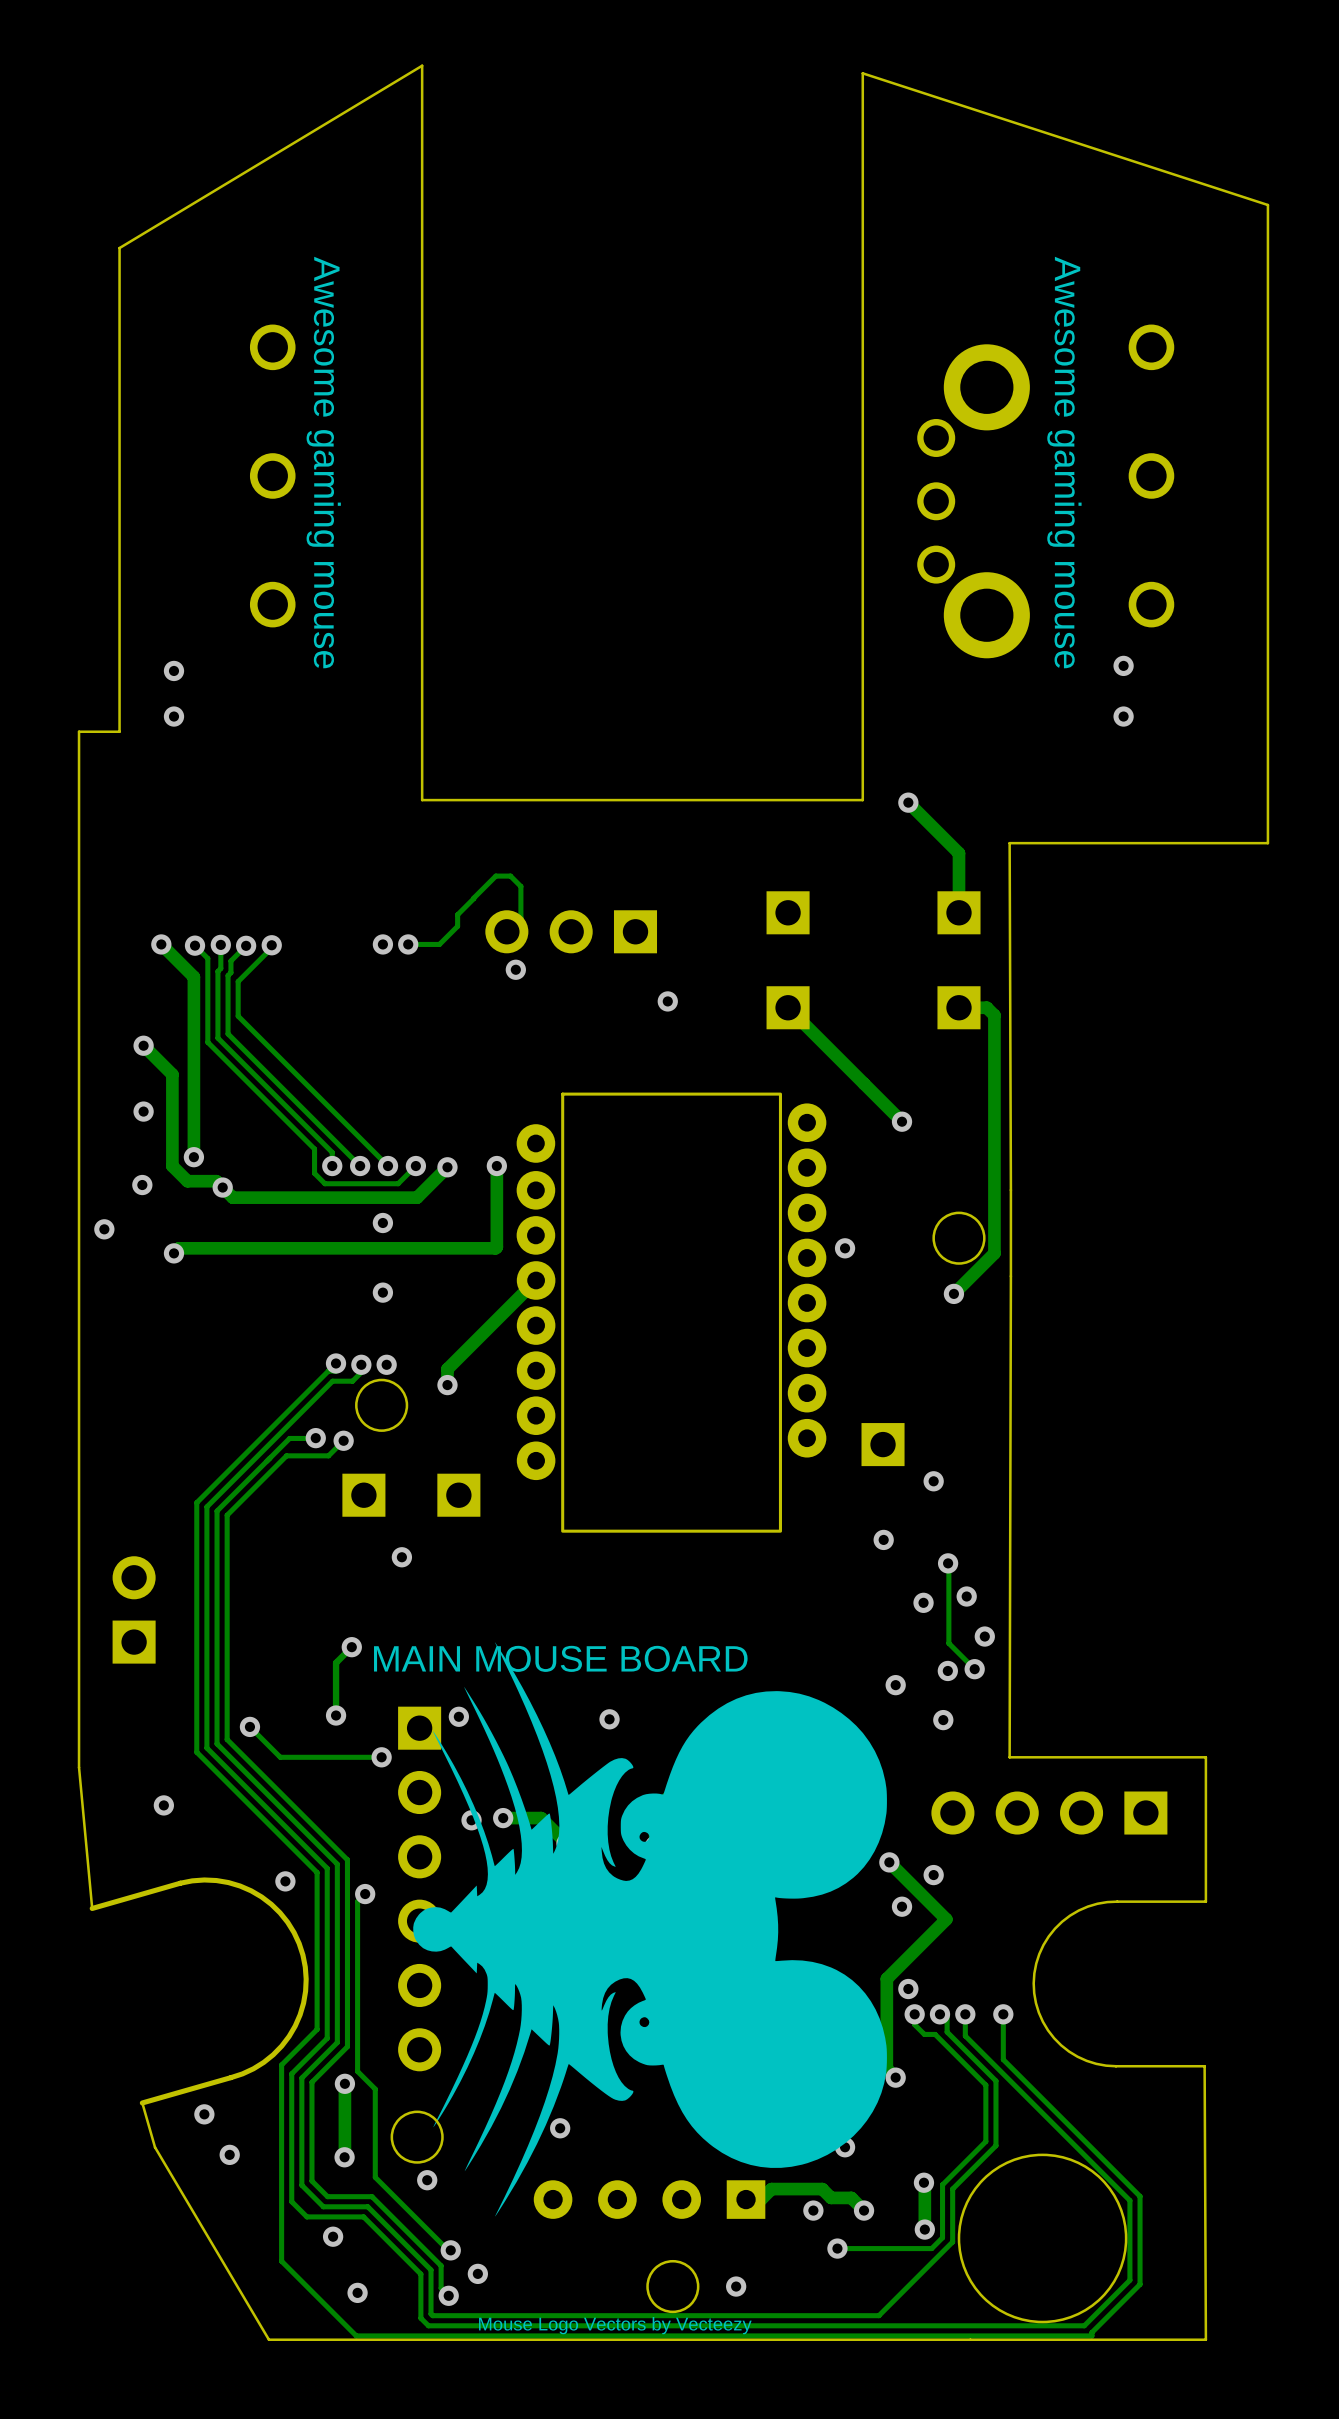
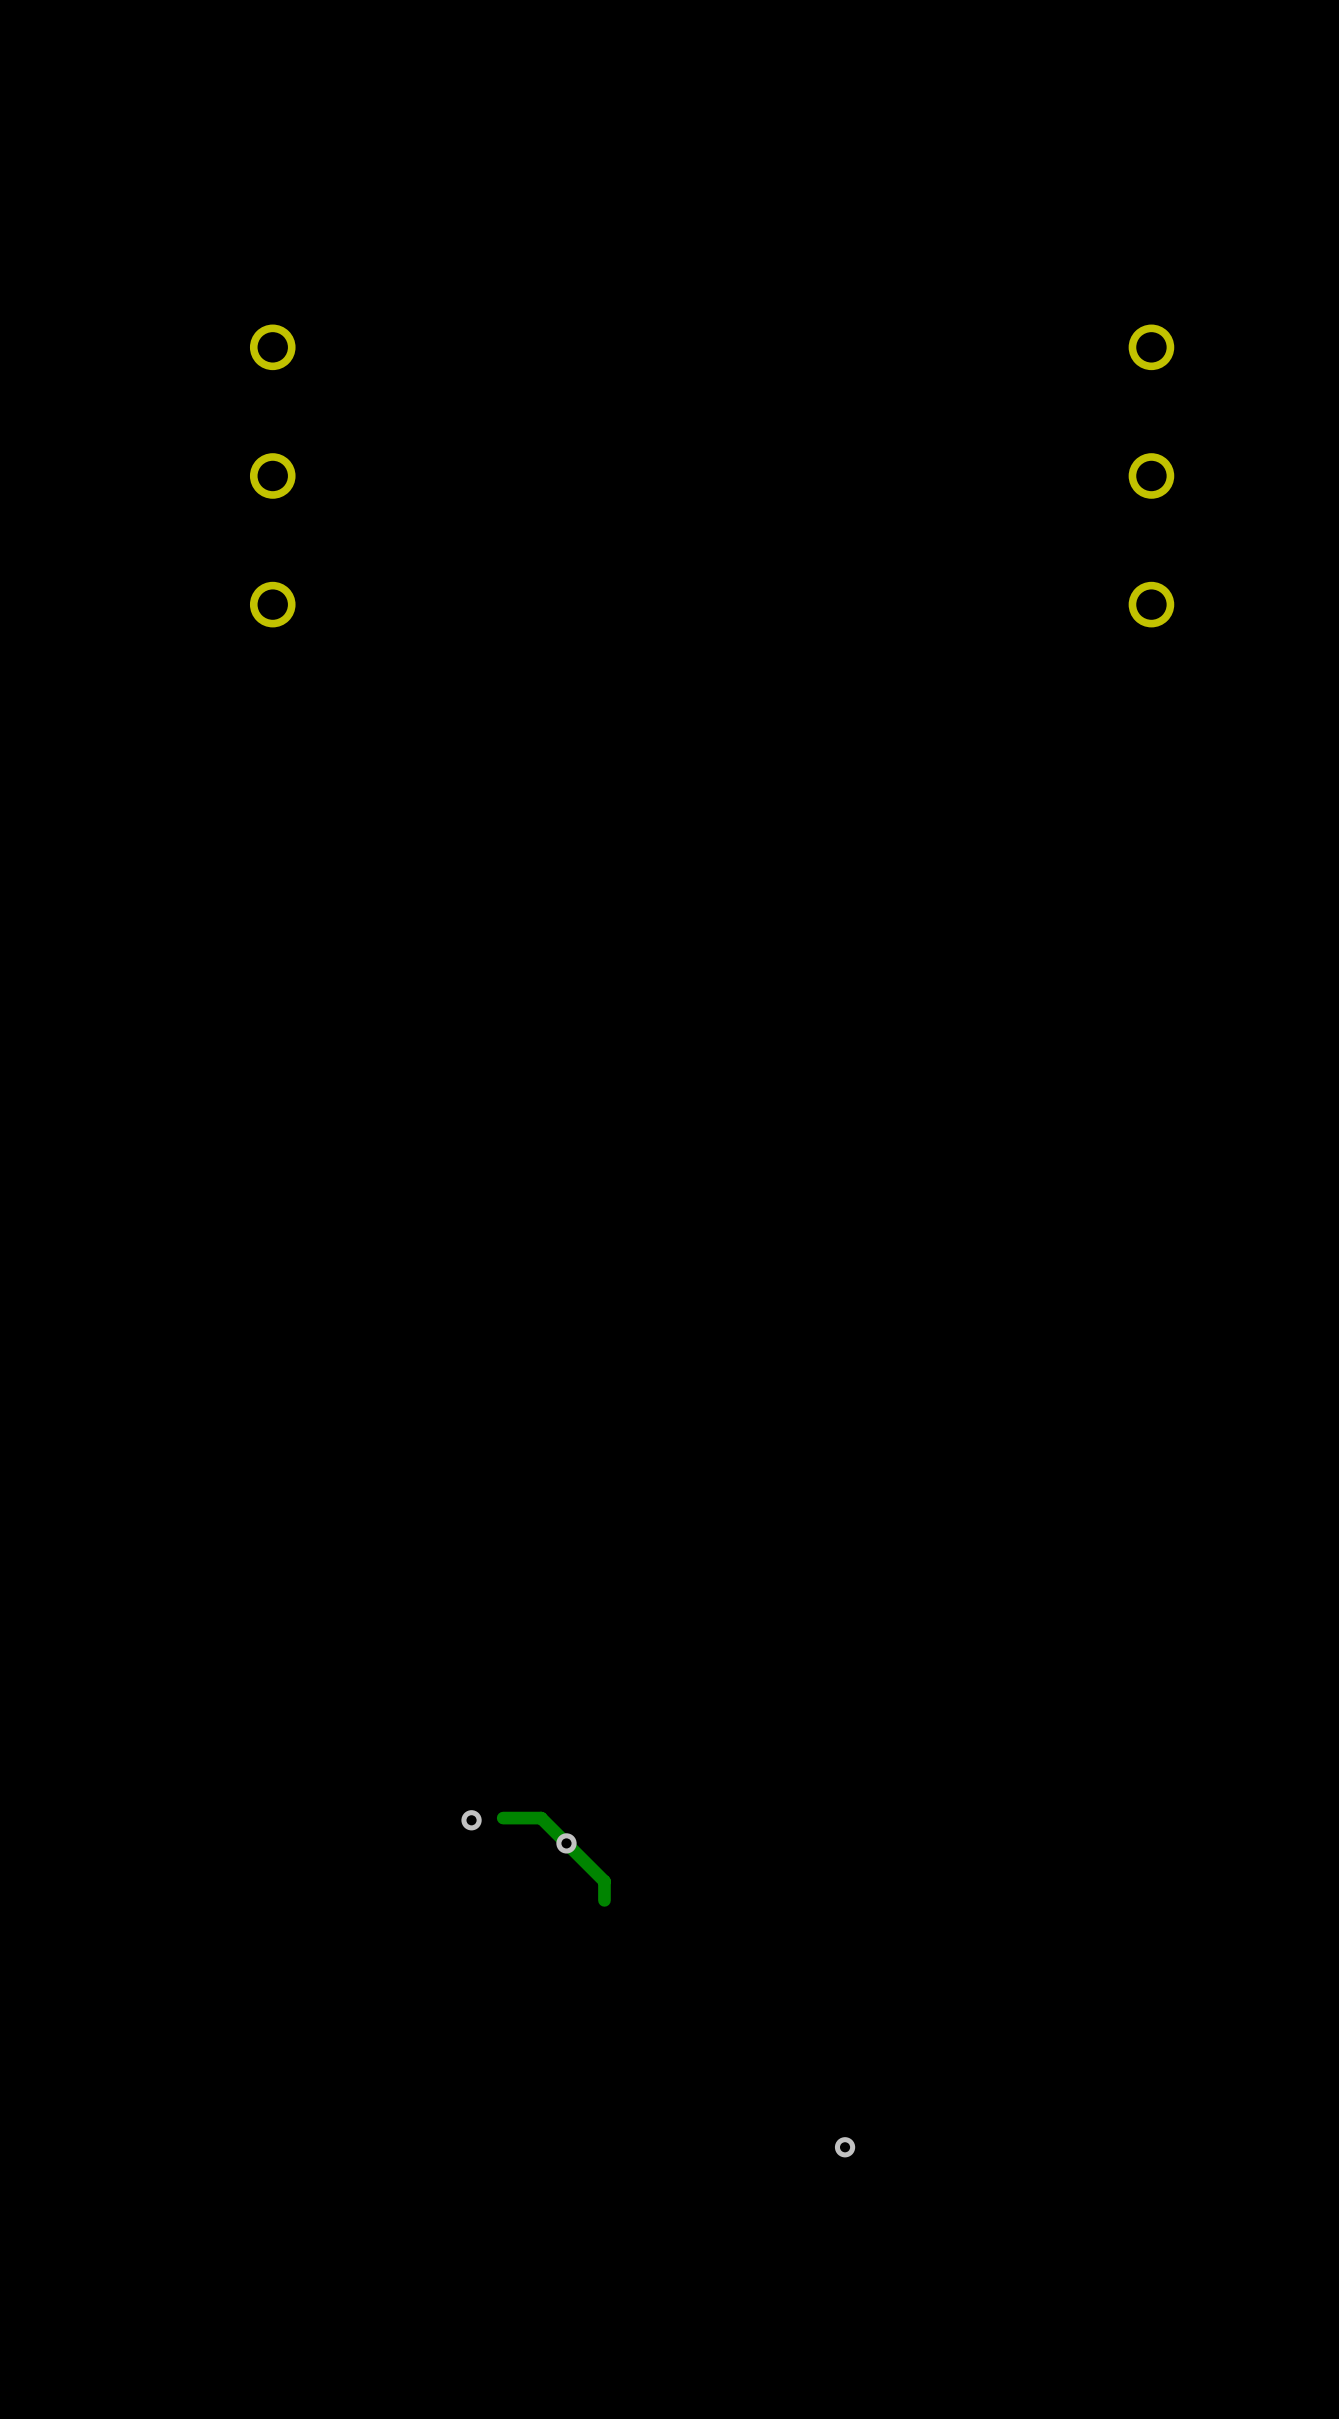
board edge: (422, 65) (119, 248) (119, 731) (79, 731) (79, 1767) (92, 1908) (192, 1880) (216, 1880) (240, 1886) (261, 1896) (287, 1922) (299, 1943) (306, 1979) (303, 2003) (295, 2025) (281, 2046) (263, 2062) (242, 2073) (142, 2102) (155, 2147) (268, 2339) (1205, 2339) (1204, 2066) (1115, 2066) (1086, 2060) (1069, 2051) (1054, 2038) (1042, 2021) (1034, 1993) (1034, 1973) (1043, 1944) (1055, 1928) (1078, 1910) (1107, 1902) (1205, 1901) (1205, 1757) (1009, 1757) (1009, 843) (1267, 843) (1267, 205) (862, 73) (862, 800) (422, 800) (422, 65) -> none
text: Awesome gaming mouse (323, 462) -> none
text: Awesome gaming mouse (1064, 462) -> none
part: (973, 501) -> none
via: (1123, 665) -> none
via: (173, 670) -> none
via: (173, 716) -> none
via: (1123, 716) -> none
track: (908, 802) (958, 853) (958, 912) -> none
via: (908, 802) -> none
track: (473, 898) (495, 876) (510, 876) (520, 886) (520, 917) (506, 931) -> none
track: (473, 898) (457, 914) (457, 926) (439, 944) (408, 944) -> none
part: (788, 912) -> none
part: (958, 912) -> none
part: (571, 931) -> none
track: (161, 944) (193, 977) (193, 1157) -> none
via: (161, 944) -> none
track: (220, 944) (220, 968) (217, 971) (217, 1038) (332, 1152) (332, 1166) -> none
via: (220, 944) -> none
via: (382, 944) -> none
via: (408, 944) -> none
track: (195, 945) (207, 958) (207, 1042) (314, 1149) (314, 1173) (324, 1183) (398, 1183) (415, 1166) -> none
via: (195, 945) -> none
track: (246, 945) (230, 961) (230, 972) (228, 975) (228, 1033) (360, 1166) -> none
via: (246, 945) -> none
track: (271, 945) (271, 947) (238, 981) (238, 1016) (388, 1166) -> none
via: (271, 945) -> none
via: (515, 969) -> none
via: (667, 1001) -> none
track: (788, 1007) (902, 1121) -> none
part: (788, 1007) -> none
part: (958, 1007) -> none
track: (952, 1014) (958, 1007) (986, 1007) (994, 1015) (994, 1253) (953, 1293) -> none
track: (143, 1045) (172, 1074) (172, 1166) (187, 1181) (216, 1181) (232, 1197) (417, 1197) (447, 1167) -> none
via: (143, 1045) -> none
via: (143, 1111) -> none
via: (902, 1121) -> none
via: (193, 1157) -> none
via: (332, 1166) -> none
via: (360, 1166) -> none
via: (388, 1166) -> none
via: (415, 1166) -> none
track: (496, 1166) (495, 1248) (179, 1248) (173, 1253) -> none
via: (496, 1166) -> none
via: (447, 1167) -> none
via: (142, 1185) -> none
via: (222, 1187) -> none
round board edge: [932, 1211, 986, 1265] -> none
via: (382, 1223) -> none
via: (104, 1229) -> none
via: (845, 1248) -> none
via: (173, 1253) -> none
track: (536, 1280) (447, 1369) (447, 1385) -> none
via: (382, 1292) -> none
via: (953, 1293) -> none
part: (671, 1312) -> none
track: (336, 1363) (336, 1371) (328, 1371) (196, 1502) (196, 1752) (317, 1872) (317, 2029) (281, 2064) (281, 2261) (356, 2335) (1091, 2335) (1091, 2332) (1140, 2284) (1140, 2196) (1003, 2059) (1003, 2014) -> none
via: (336, 1363) -> none
track: (361, 1364) (361, 1372) (352, 1381) (332, 1381) (206, 1506) (206, 1748) (327, 1868) (327, 2038) (291, 2073) (291, 2201) (306, 2216) (363, 2216) (420, 2274) (420, 2318) (428, 2325) (1084, 2325) (1129, 2280) (1129, 2200) (965, 2035) (965, 2014) -> none
via: (361, 1364) -> none
via: (386, 1364) -> none
round board edge: [355, 1378, 409, 1432] -> none
via: (447, 1385) -> none
track: (315, 1438) (289, 1438) (217, 1511) (217, 1743) (337, 1864) (337, 2042) (301, 2078) (301, 2185) (323, 2206) (367, 2206) (431, 2269) (431, 2314) (432, 2315) (878, 2315) (952, 2241) (952, 2189) (995, 2145) (995, 2080) (947, 2032) (947, 2014) -> none
via: (315, 1438) -> none
track: (343, 1440) (328, 1455) (286, 1455) (227, 1515) (227, 1739) (347, 1859) (347, 2046) (311, 2082) (311, 2181) (327, 2196) (372, 2196) (441, 2265) (441, 2288) (448, 2295) -> none
via: (343, 1440) -> none
part: (883, 1444) -> none
via: (933, 1481) -> none
part: (363, 1495) -> none
part: (458, 1495) -> none
via: (883, 1539) -> none
via: (401, 1557) -> none
track: (948, 1563) (948, 1643) (974, 1669) -> none
via: (948, 1563) -> none
via: (966, 1596) -> none
via: (923, 1602) -> none
part: (134, 1609) -> none
via: (984, 1636) -> none
track: (351, 1647) (336, 1662) (336, 1715) -> none
via: (351, 1647) -> none
text: MAIN MOUSE BOARD (560, 1658) -> none
via: (974, 1669) -> none
via: (947, 1670) -> none
via: (895, 1685) -> none
via: (336, 1715) -> none
via: (458, 1716) -> none
via: (609, 1719) -> none
via: (943, 1720) -> none
track: (249, 1726) (280, 1757) (381, 1757) -> none
via: (249, 1726) -> none
via: (381, 1757) -> none
via: (163, 1805) -> none
part: (1049, 1813) -> none
via: (503, 1818) -> none
track: (889, 1862) (946, 1919) (886, 1978) (886, 2068) (895, 2077) -> none
via: (889, 1862) -> none
via: (933, 1875) -> none
via: (285, 1881) -> none
part: (419, 1888) -> none
track: (365, 1894) (357, 1901) (357, 2071) (375, 2089) (375, 2177) (446, 2248) (450, 2250) -> none
via: (365, 1894) -> none
via: (902, 1906) -> none
part: (650, 1929) -> none
via: (908, 1989) -> none
track: (914, 2014) (914, 2024) (924, 2034) (935, 2034) (985, 2085) (985, 2141) (942, 2184) (942, 2237) (931, 2248) (837, 2248) -> none
via: (914, 2014) -> none
via: (939, 2014) -> none
via: (965, 2014) -> none
via: (1003, 2014) -> none
via: (895, 2077) -> none
track: (344, 2083) (344, 2156) -> none
via: (344, 2083) -> none
round board edge: [390, 2110, 444, 2164] -> none
via: (204, 2114) -> none
via: (560, 2128) -> none
round board edge: [957, 2153, 1128, 2324] -> none
via: (229, 2154) -> none
via: (344, 2157) -> none
via: (427, 2180) -> none
track: (923, 2182) (924, 2229) -> none
via: (923, 2182) -> none
part: (649, 2199) -> none
track: (746, 2199) (761, 2199) (771, 2189) (822, 2189) (831, 2197) (851, 2197) (864, 2210) -> none
via: (813, 2210) -> none
via: (864, 2210) -> none
via: (924, 2229) -> none
via: (333, 2236) -> none
via: (837, 2248) -> none
via: (450, 2250) -> none
round board edge: [646, 2259, 700, 2314] -> none
via: (477, 2273) -> none
via: (736, 2286) -> none
via: (357, 2292) -> none
via: (448, 2295) -> none
text: Mouse Logo Vectors by Vecteezy (615, 2325) -> none

